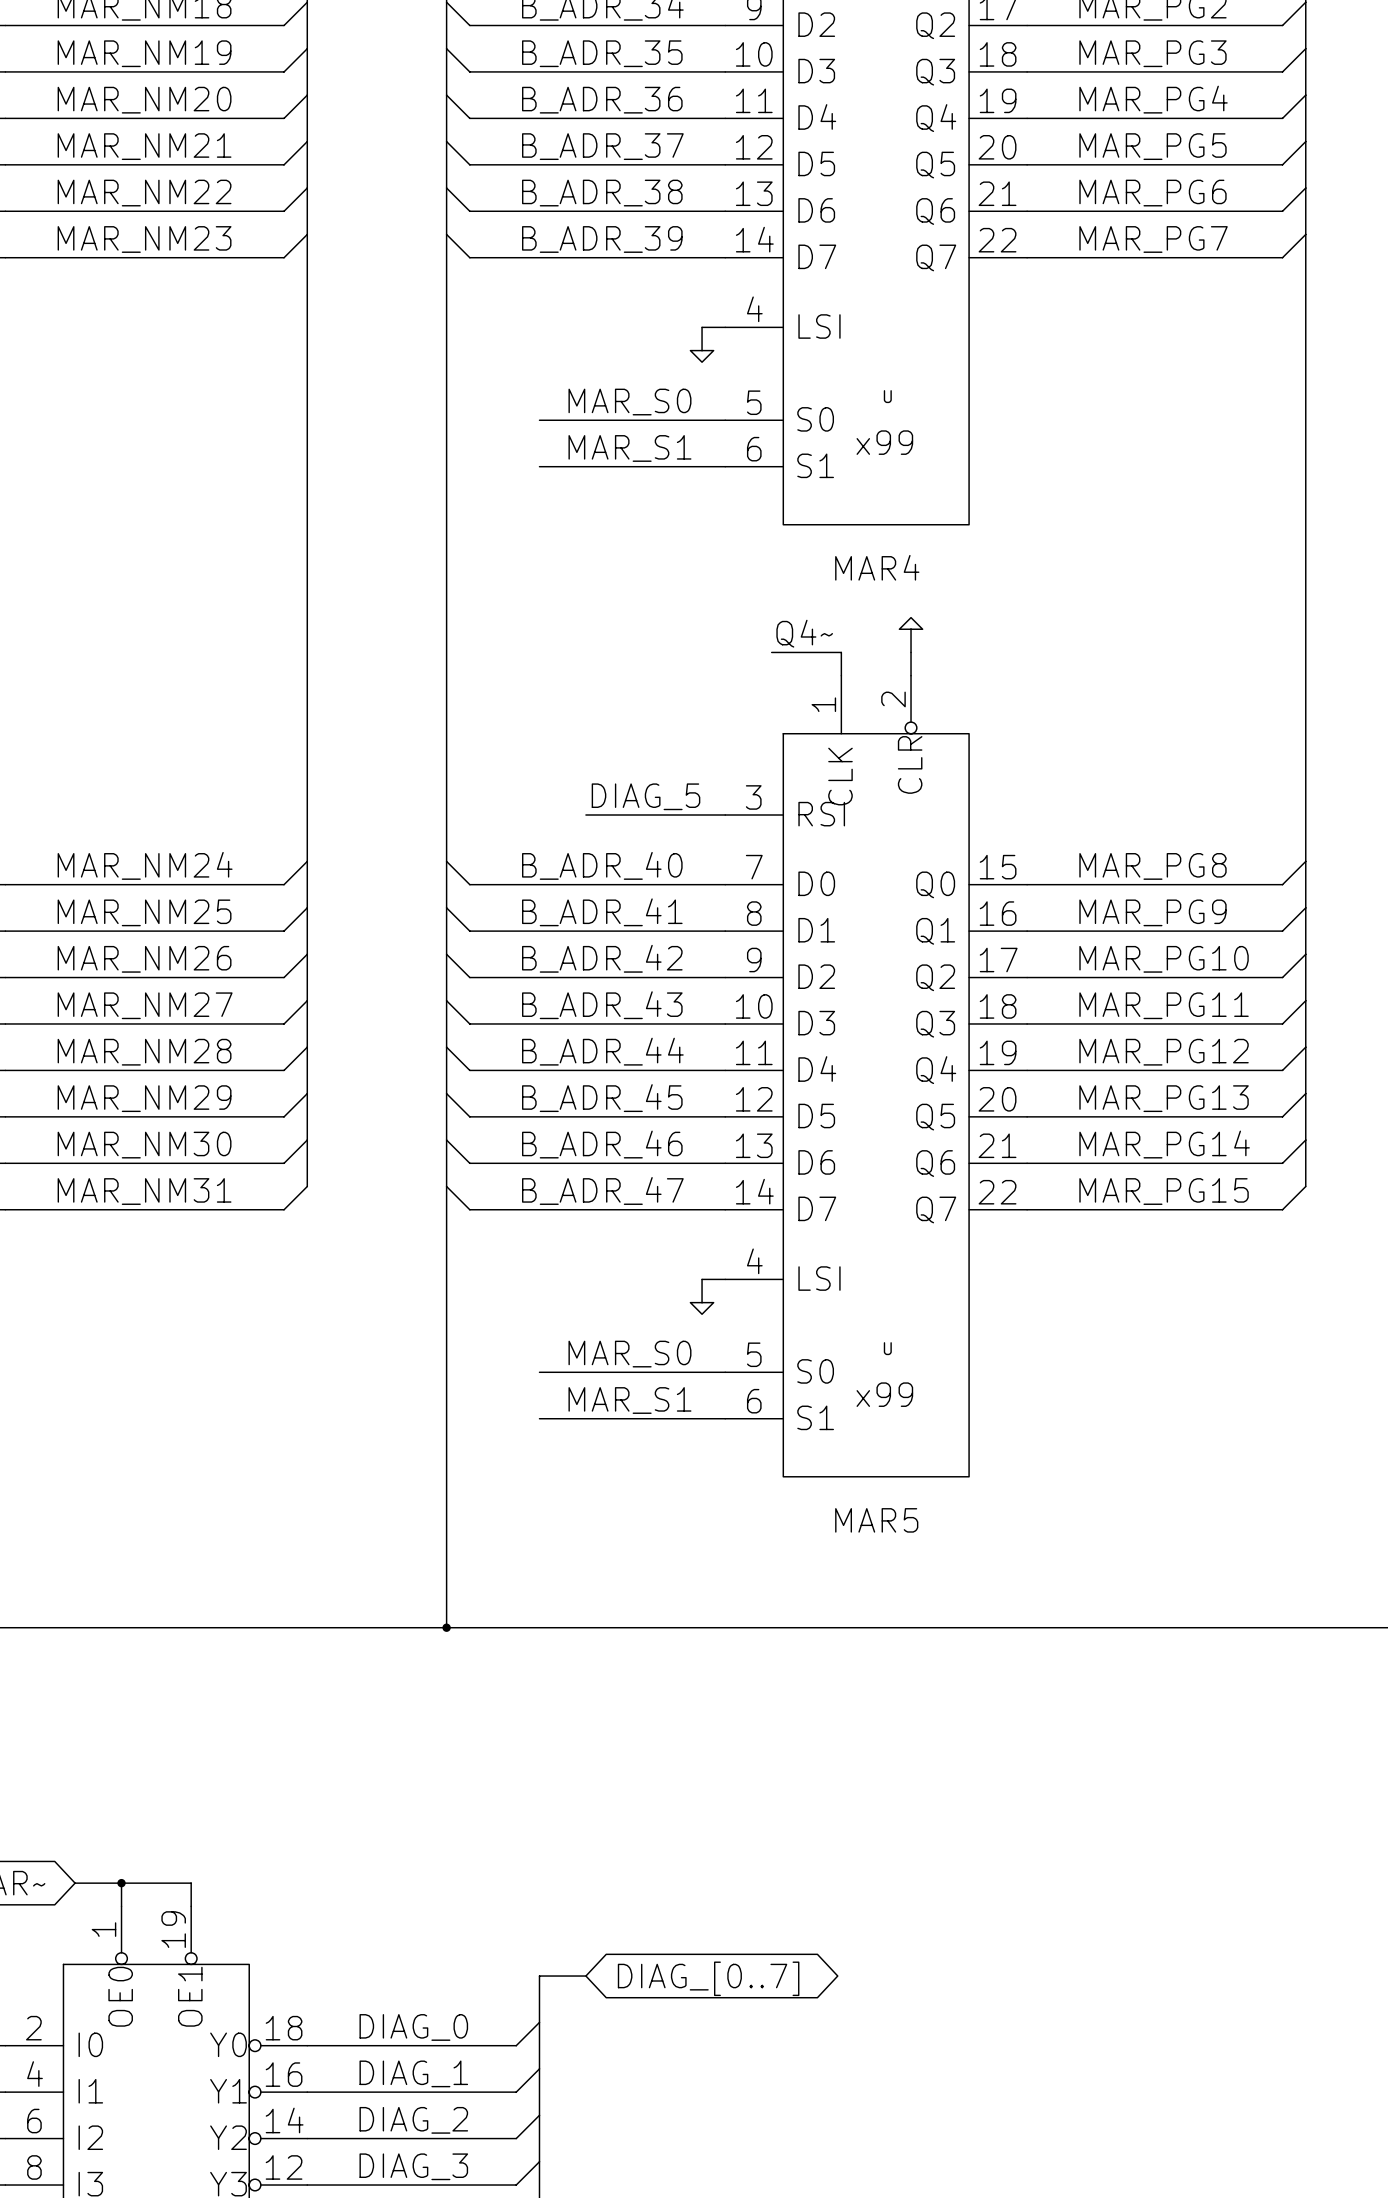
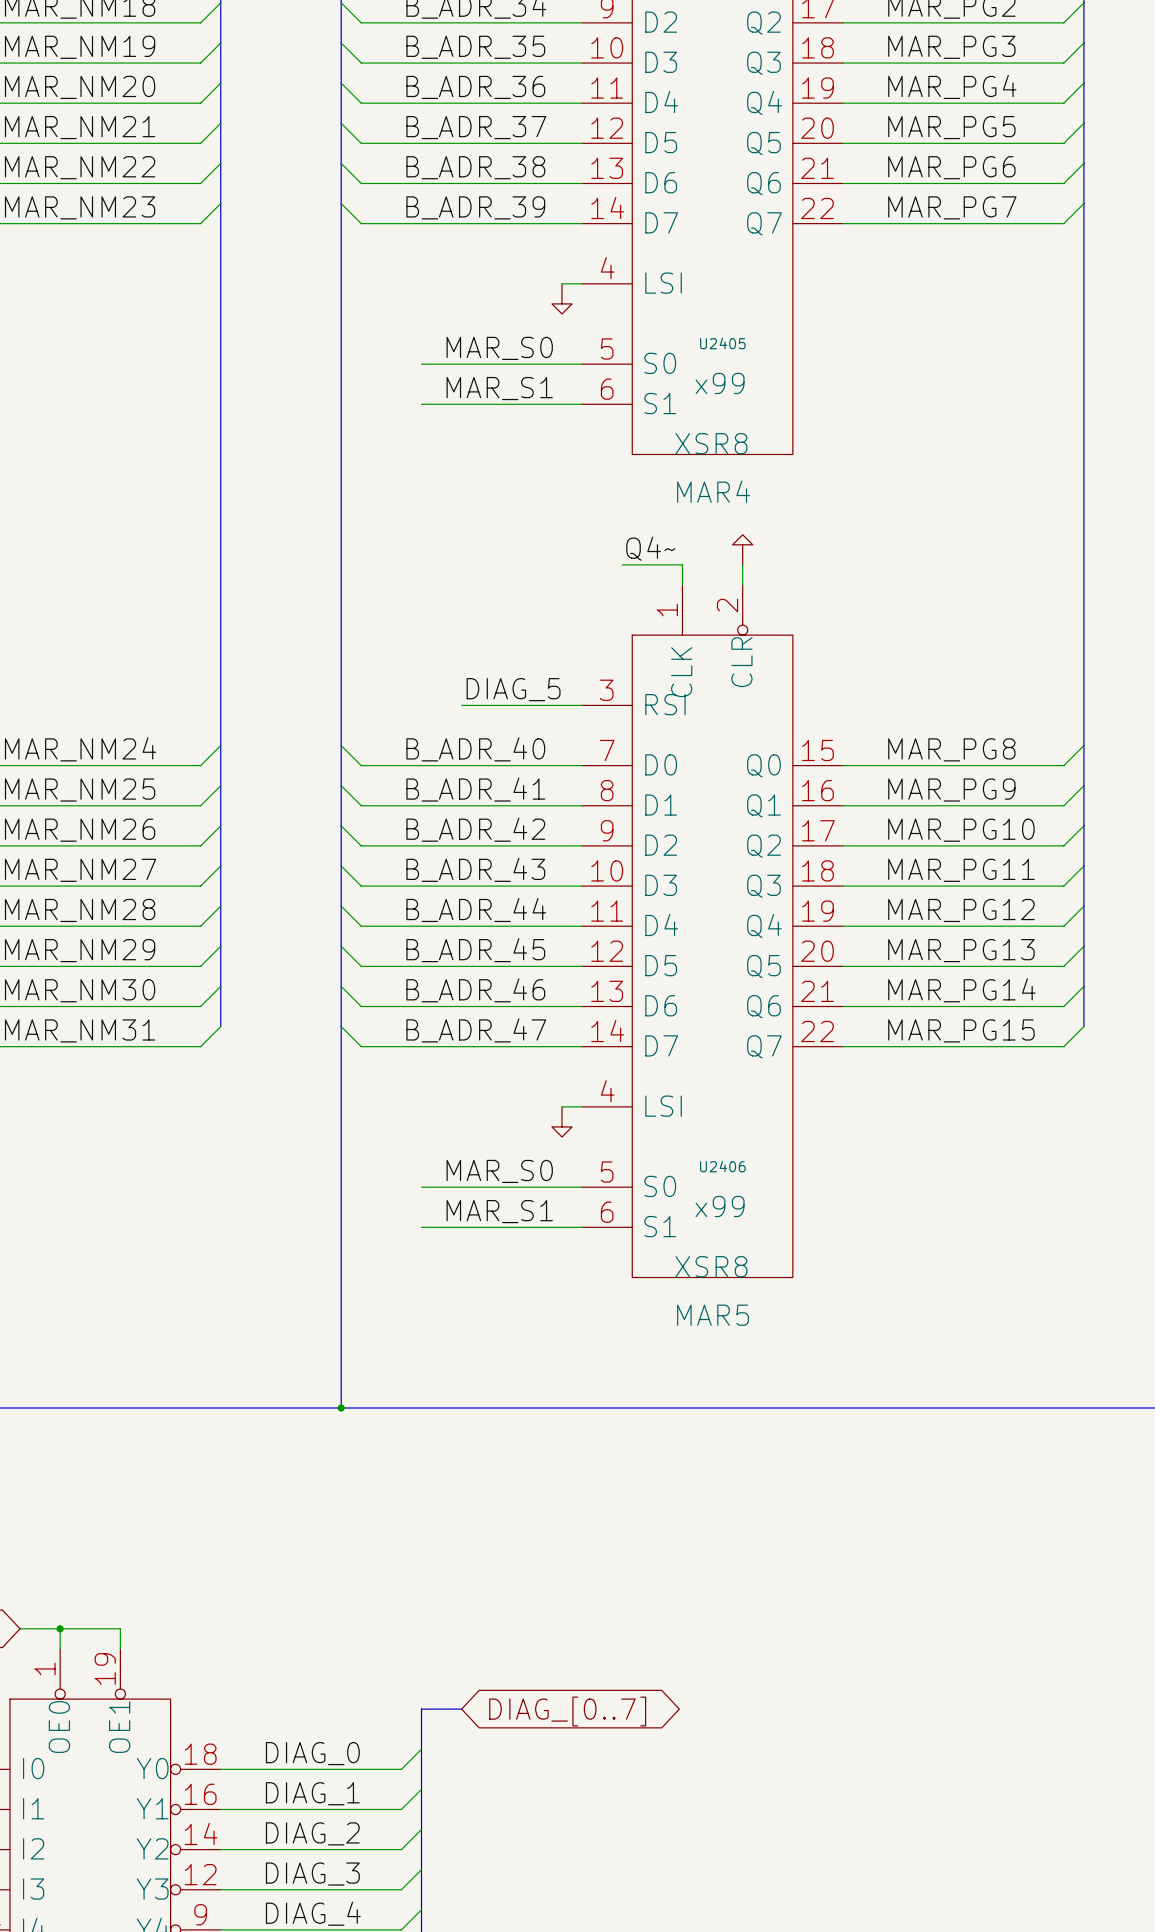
U name: U (887, 396) -> U2405 (722, 343)
U value: none -> XSR8 (711, 443)
U name: U (887, 1348) -> U2406 (722, 1166)
U value: none -> XSR8 (711, 1266)

